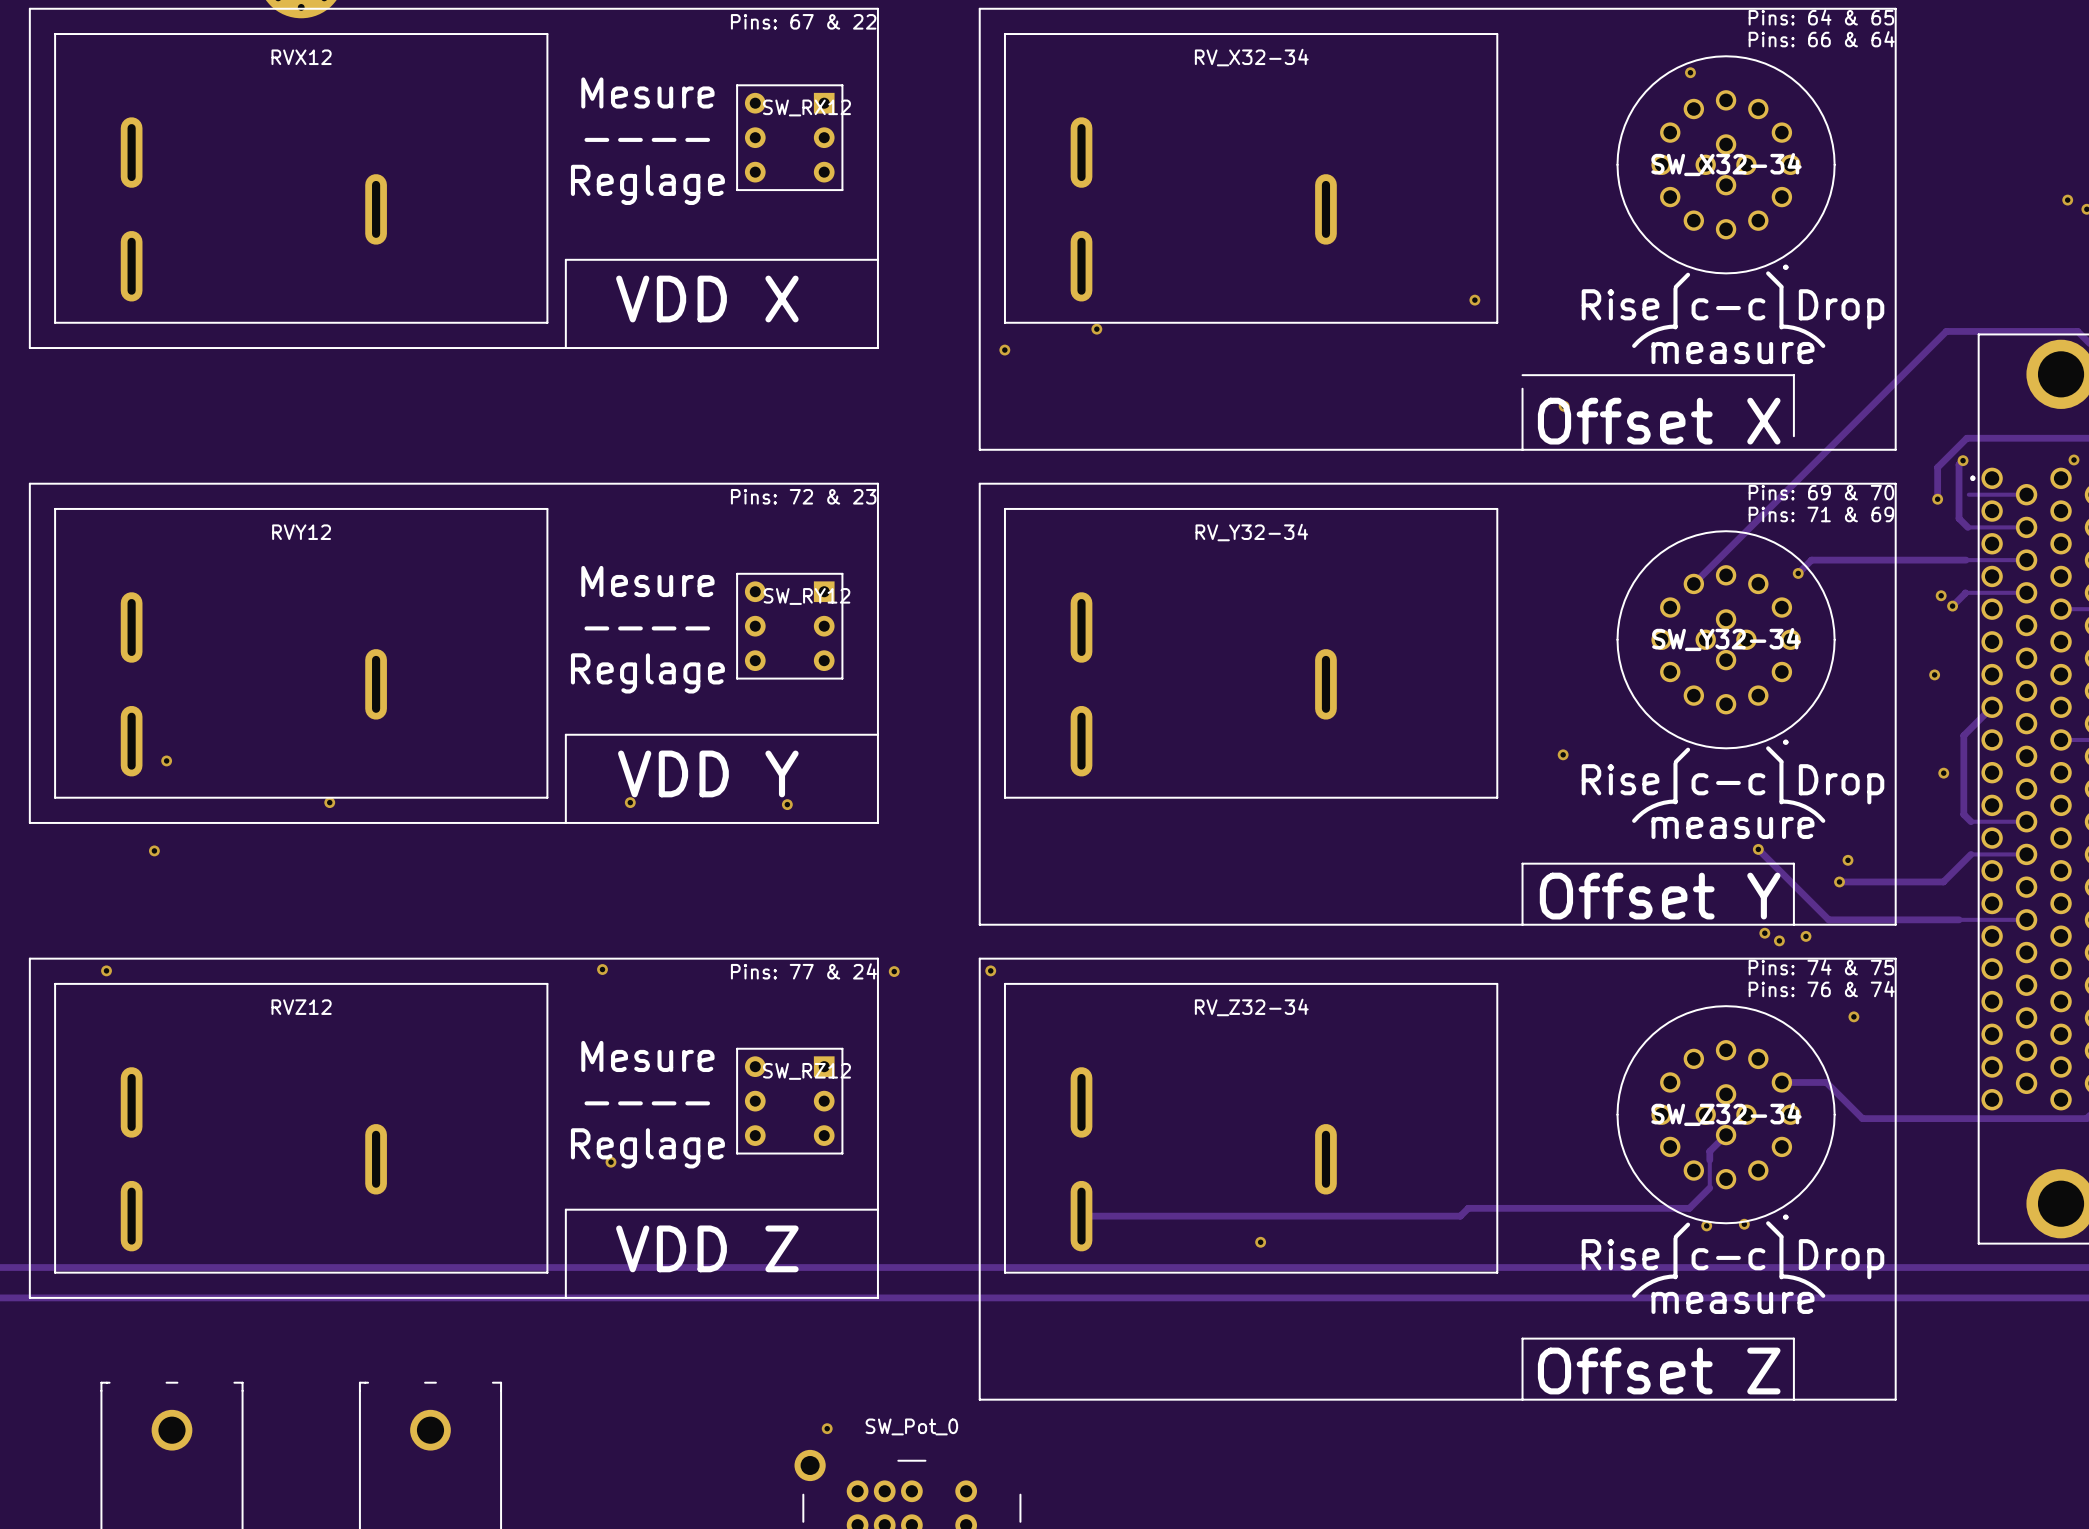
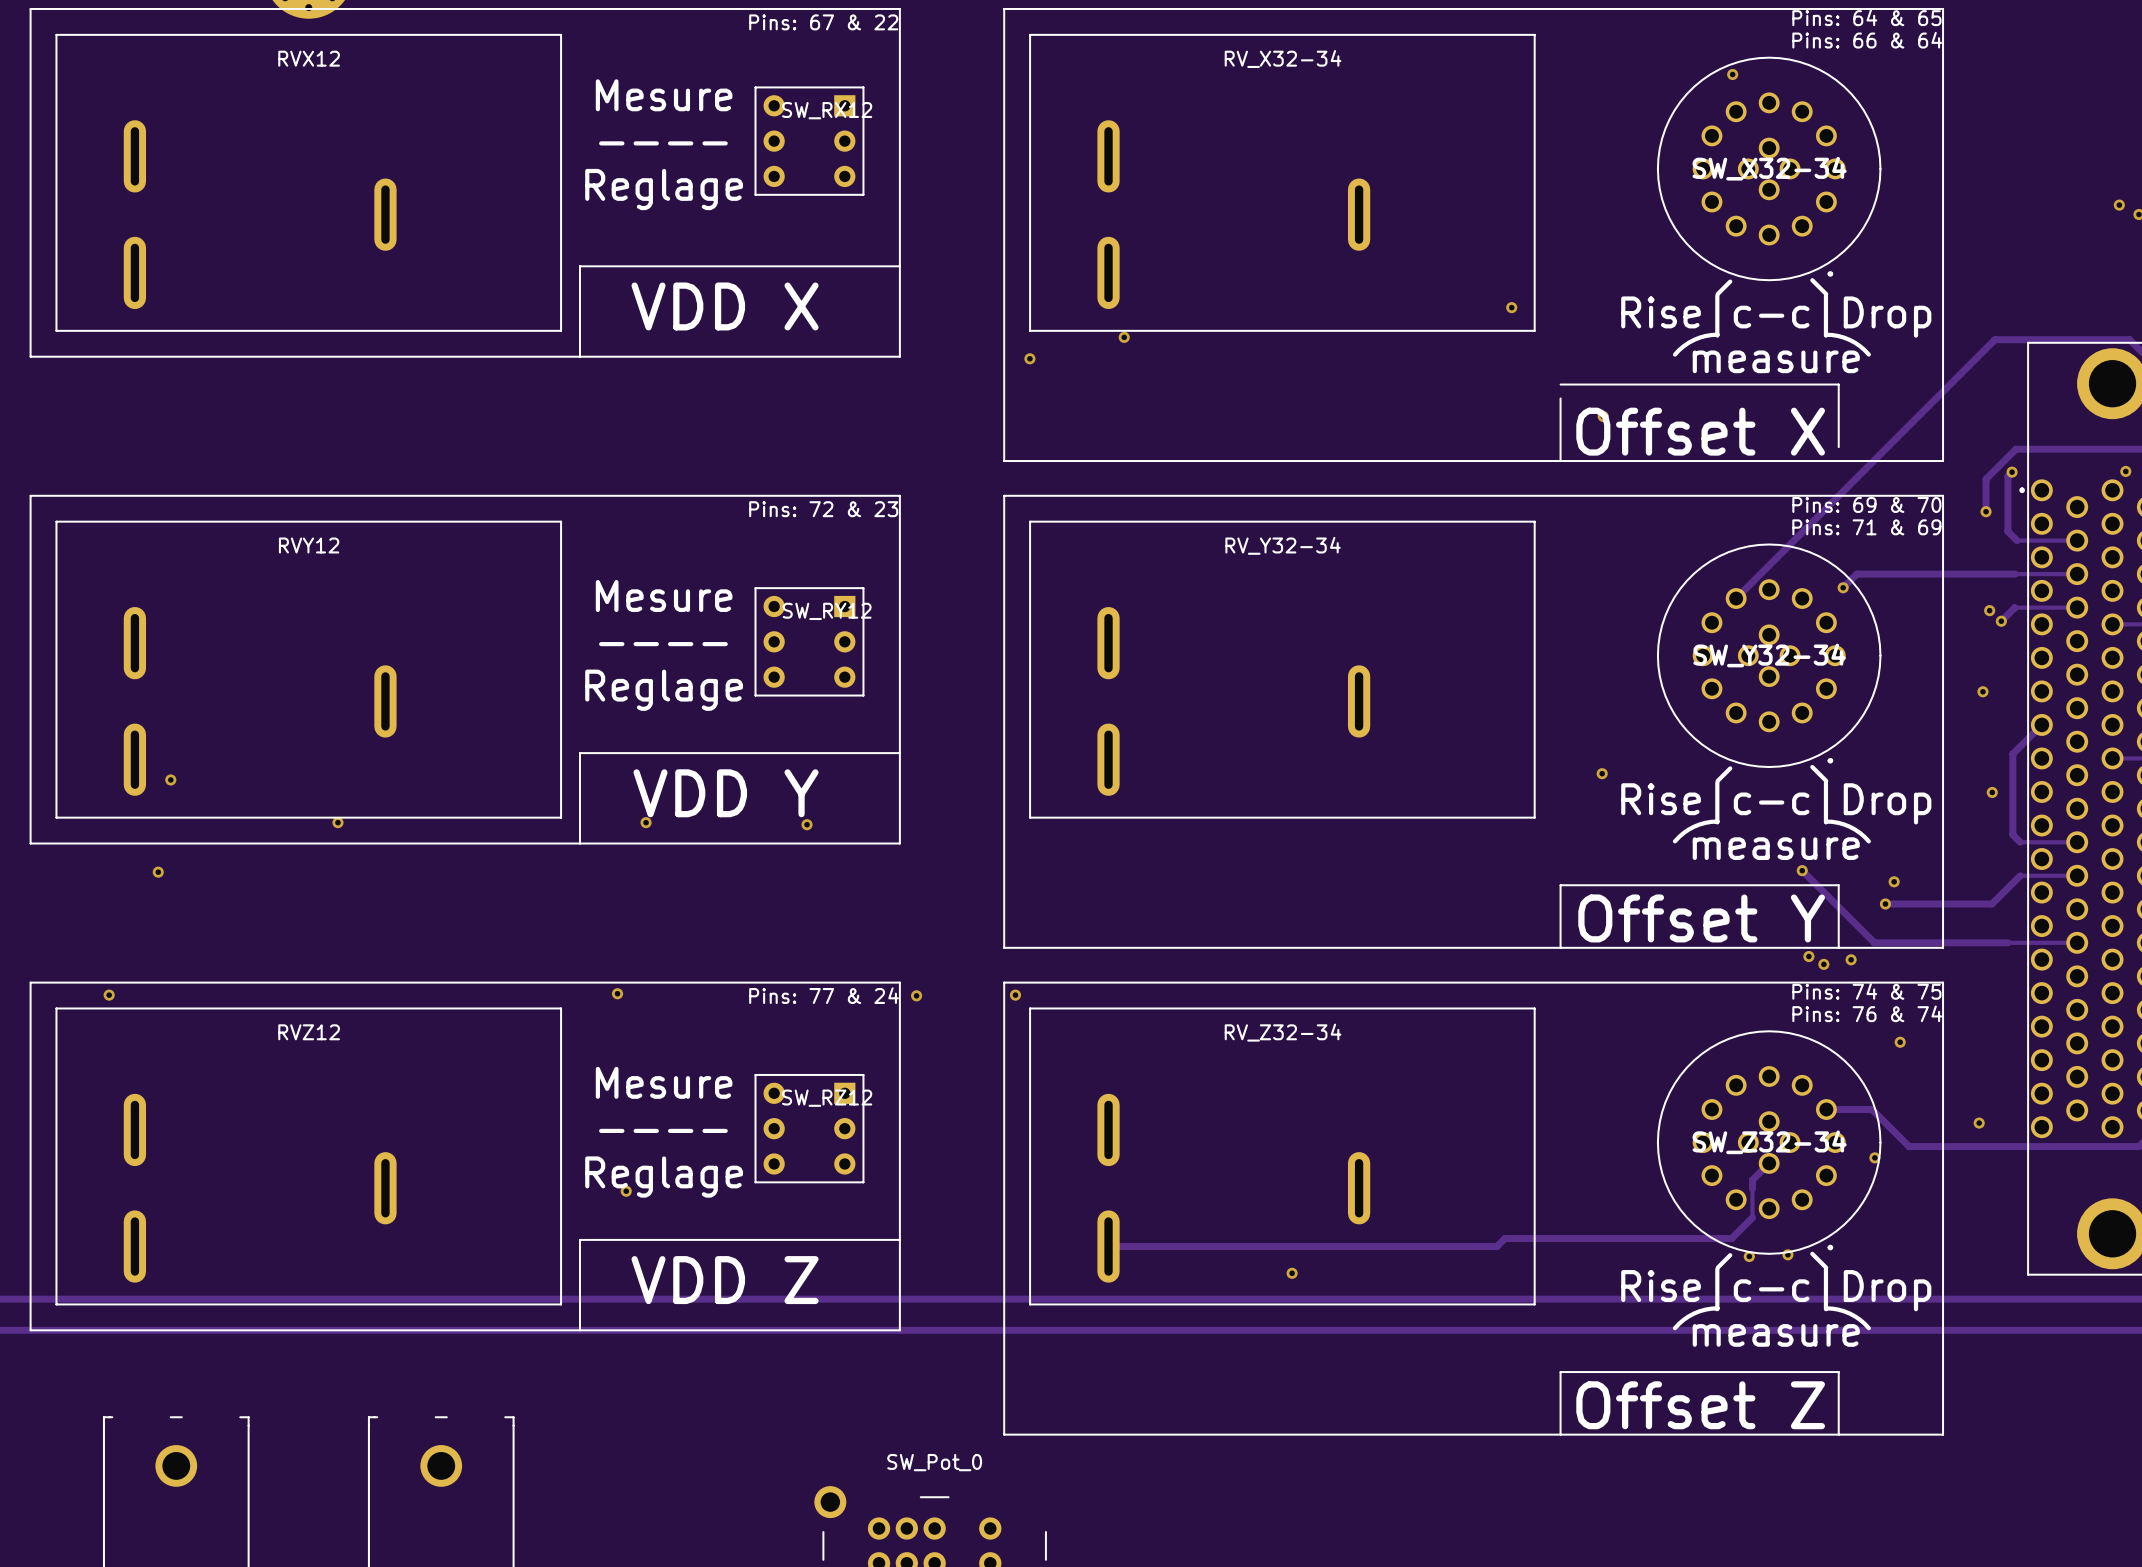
track: (1968, 494) (2026, 494) -> none
via: none -> (1979, 1123)
via: none -> (1874, 1157)
via: (827, 1428) -> none

